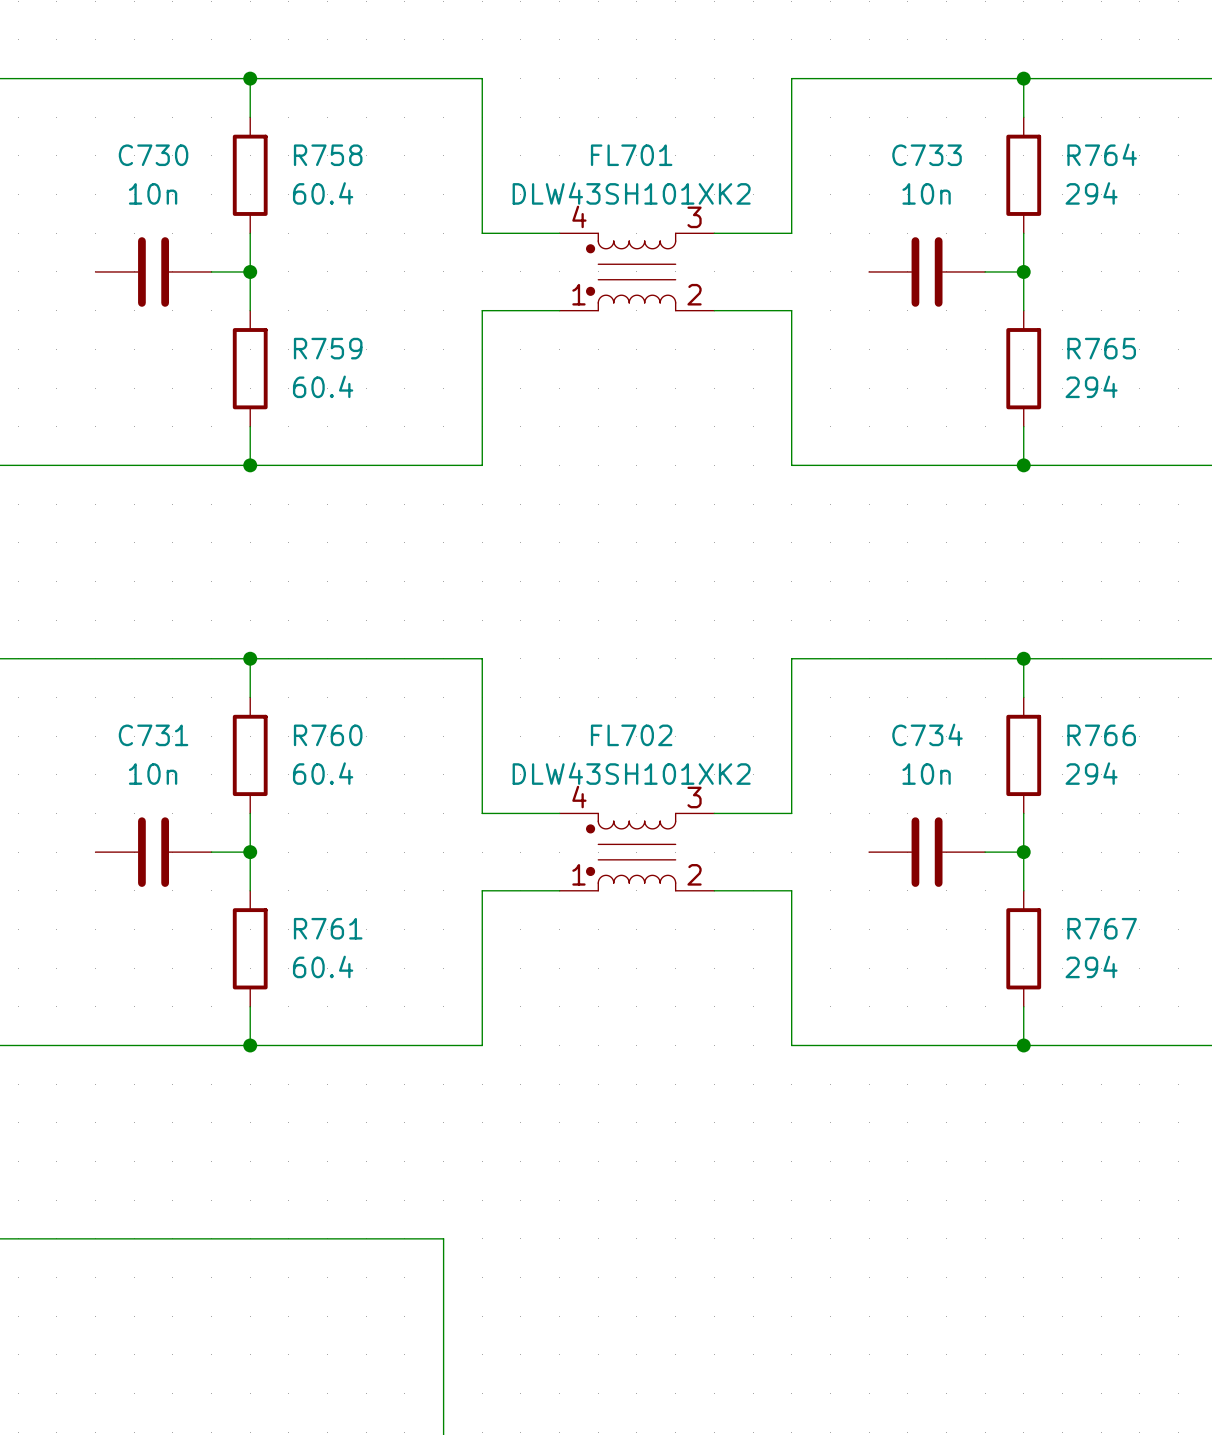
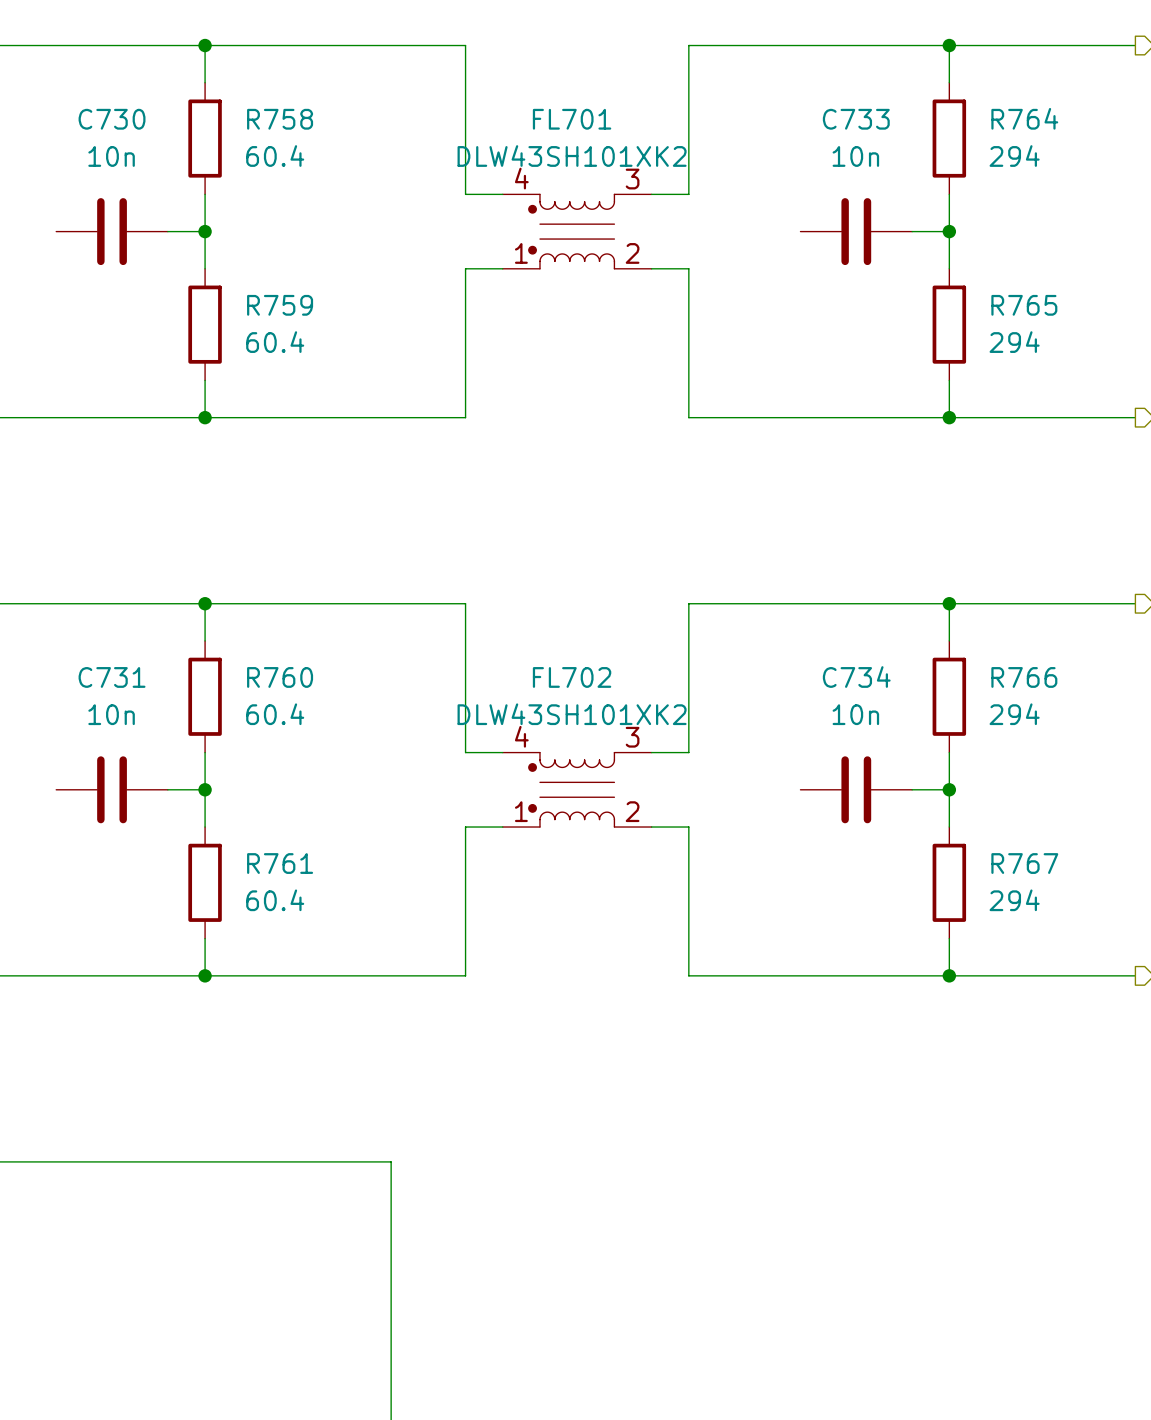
wire: (482, 78) (482, 233) (520, 233) -> (428, 45) (465, 45) (465, 194)
wire: (791, 78) (791, 233) (753, 233) -> (726, 45) (688, 45) (688, 194)
wire: (520, 310) (482, 310) (482, 465) -> (465, 268) (465, 417) (428, 417)
wire: (753, 310) (791, 310) (791, 465) -> (688, 268) (688, 417) (726, 417)
wire: (482, 658) (482, 813) (520, 813) -> (428, 603) (465, 603) (465, 752)
wire: (791, 658) (791, 813) (753, 813) -> (726, 603) (688, 603) (688, 752)
wire: (520, 890) (482, 890) (482, 1045) -> (465, 827) (465, 975) (428, 975)
wire: (753, 890) (791, 890) (791, 1045) -> (688, 827) (688, 975) (726, 975)

